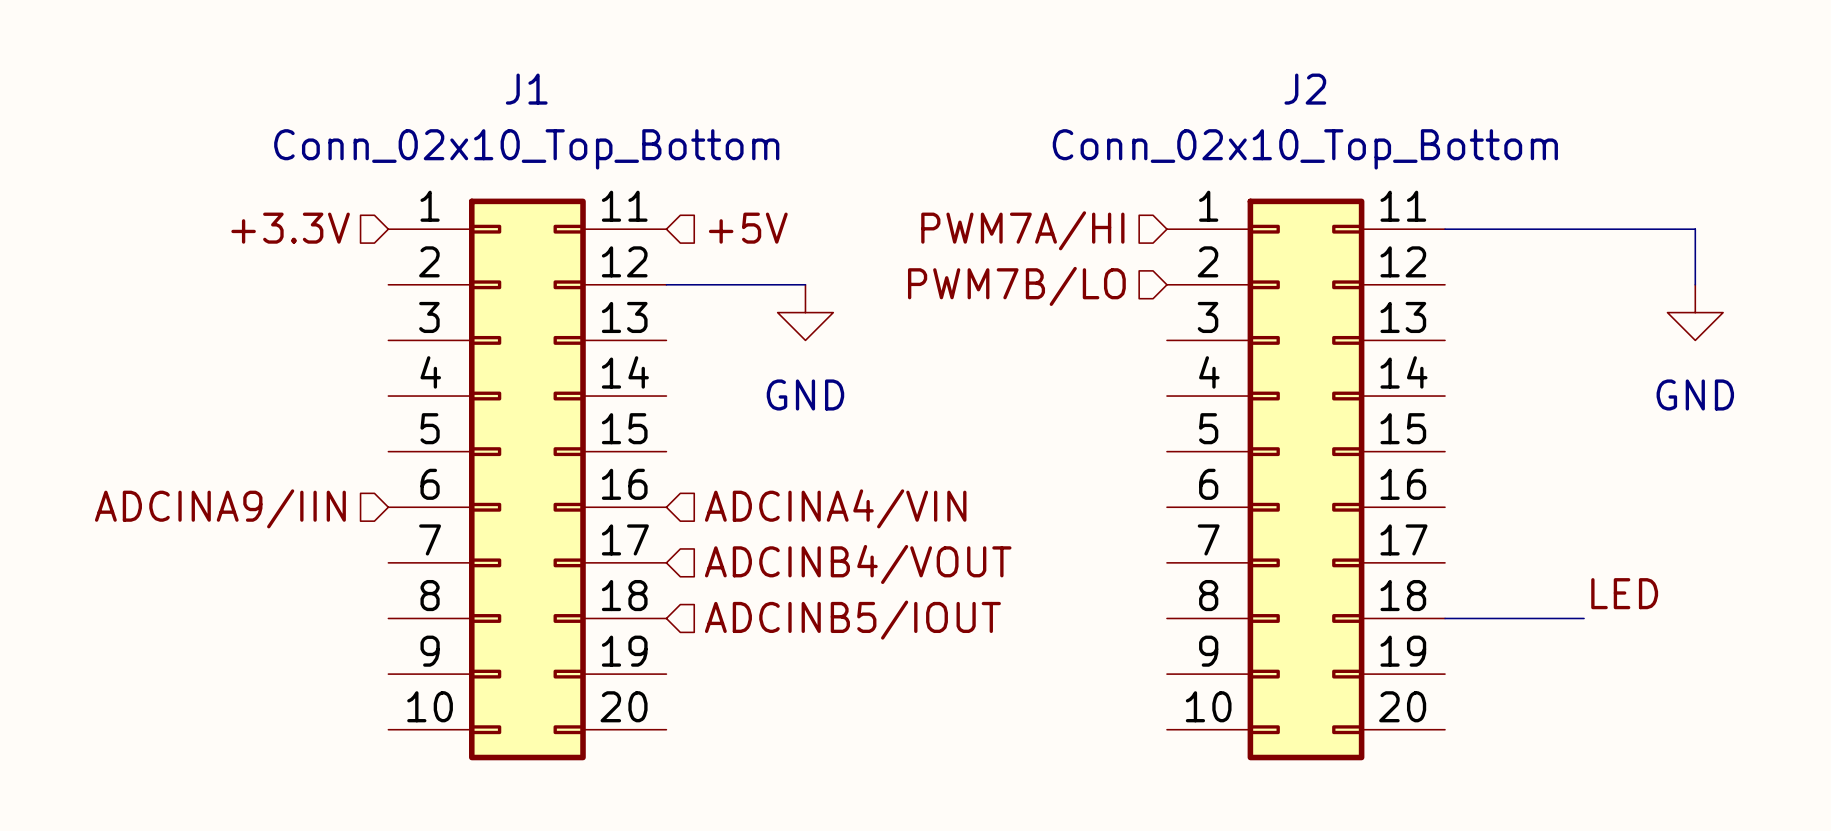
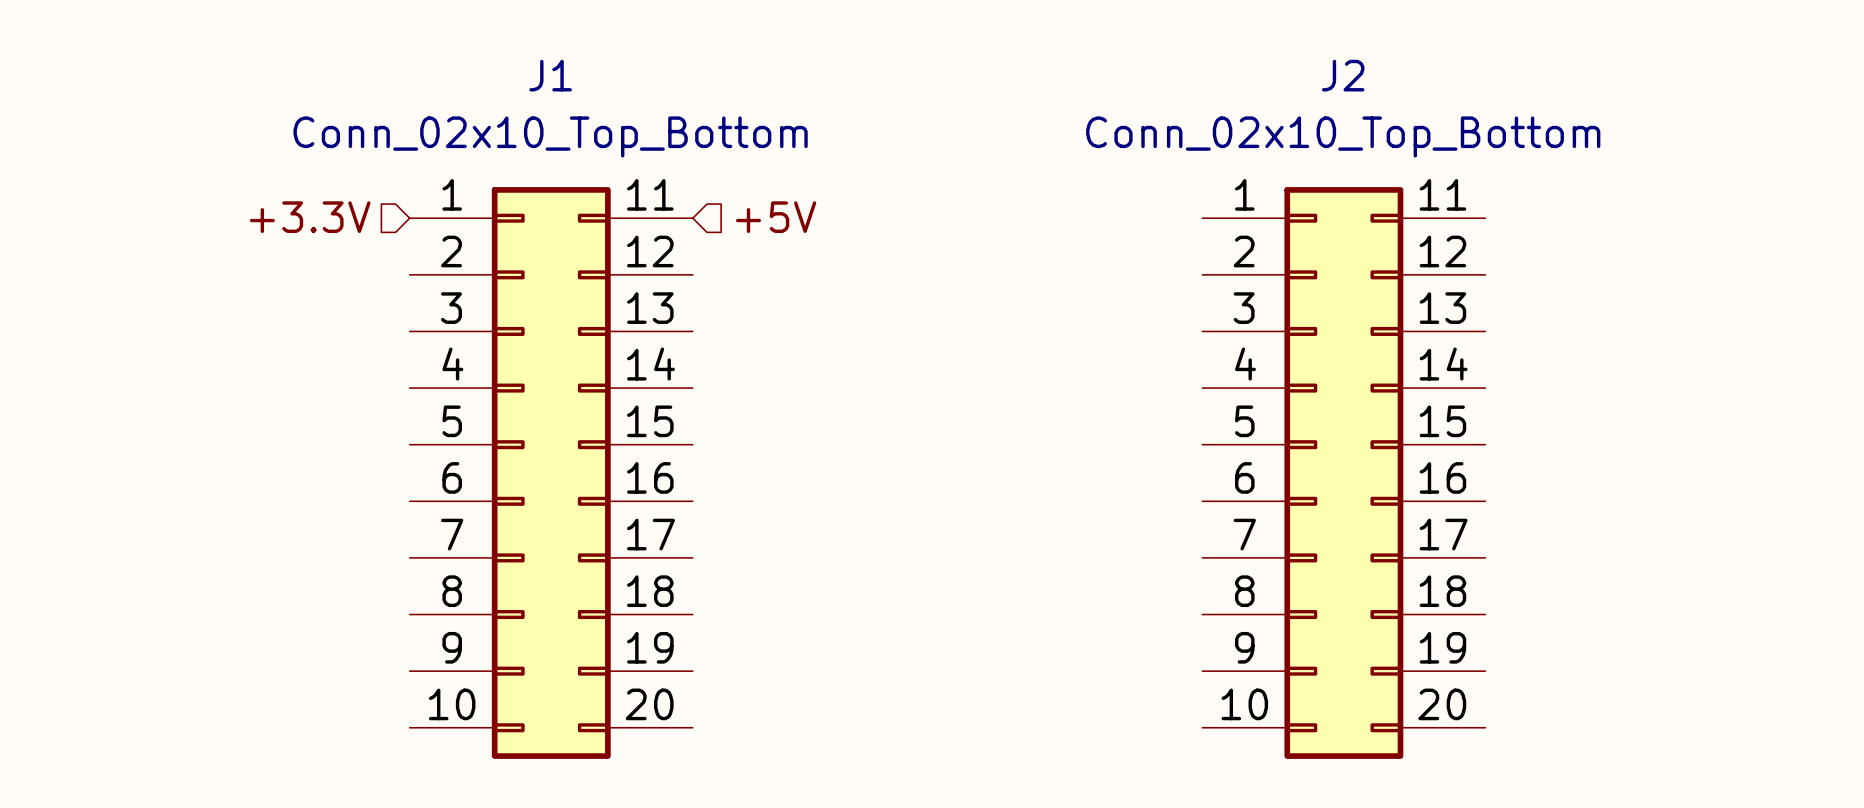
wire: (1445, 229) (1695, 229) (1695, 284) -> none
hierarchical label: PWM7A/HI (1022, 230) -> none
wire: (666, 284) (805, 284) -> none
hierarchical label: PWM7B/LO (1016, 286) -> none
power symbol: GND (805, 312) -> none
power symbol: GND (1695, 312) -> none
hierarchical label: ADCINA9/IIN (220, 508) -> none
hierarchical label: ADCINA4/VIN (835, 508) -> none
hierarchical label: ADCINB4/VOUT (858, 564) -> none
label: LED (1624, 593) -> none
wire: (1445, 618) (1584, 618) -> none
hierarchical label: ADCINB5/IOUT (852, 620) -> none

